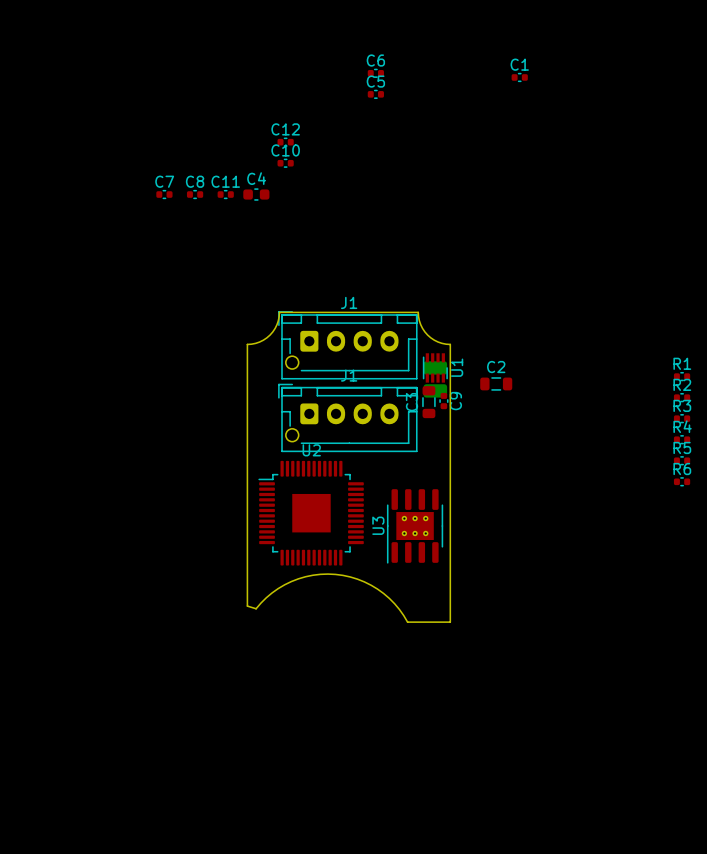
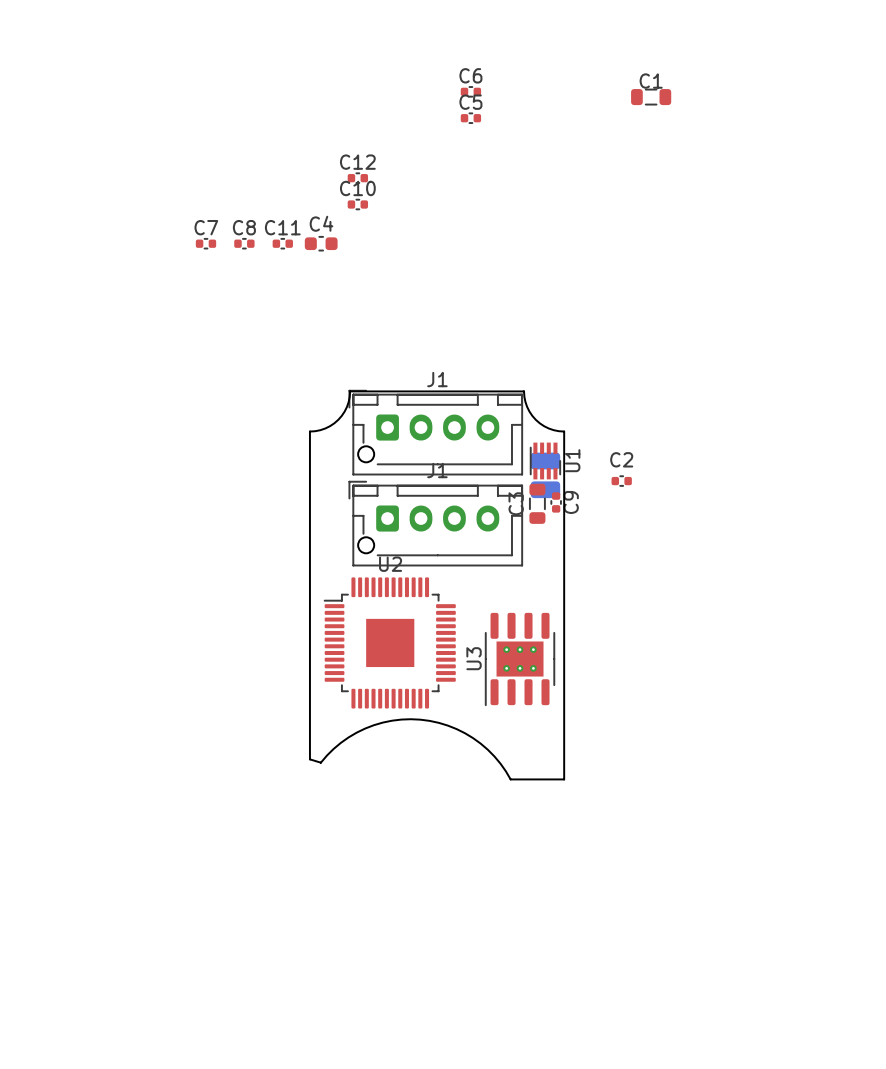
C1 footprint: [511, 72, 528, 82] -> [631, 88, 672, 106]
R1: (682, 376) -> none
C2 footprint: [480, 377, 513, 391] -> [611, 475, 632, 487]
R2: (682, 397) -> none
R3: (682, 418) -> none
R4: (682, 439) -> none
R5: (682, 460) -> none
R6: (682, 481) -> none

